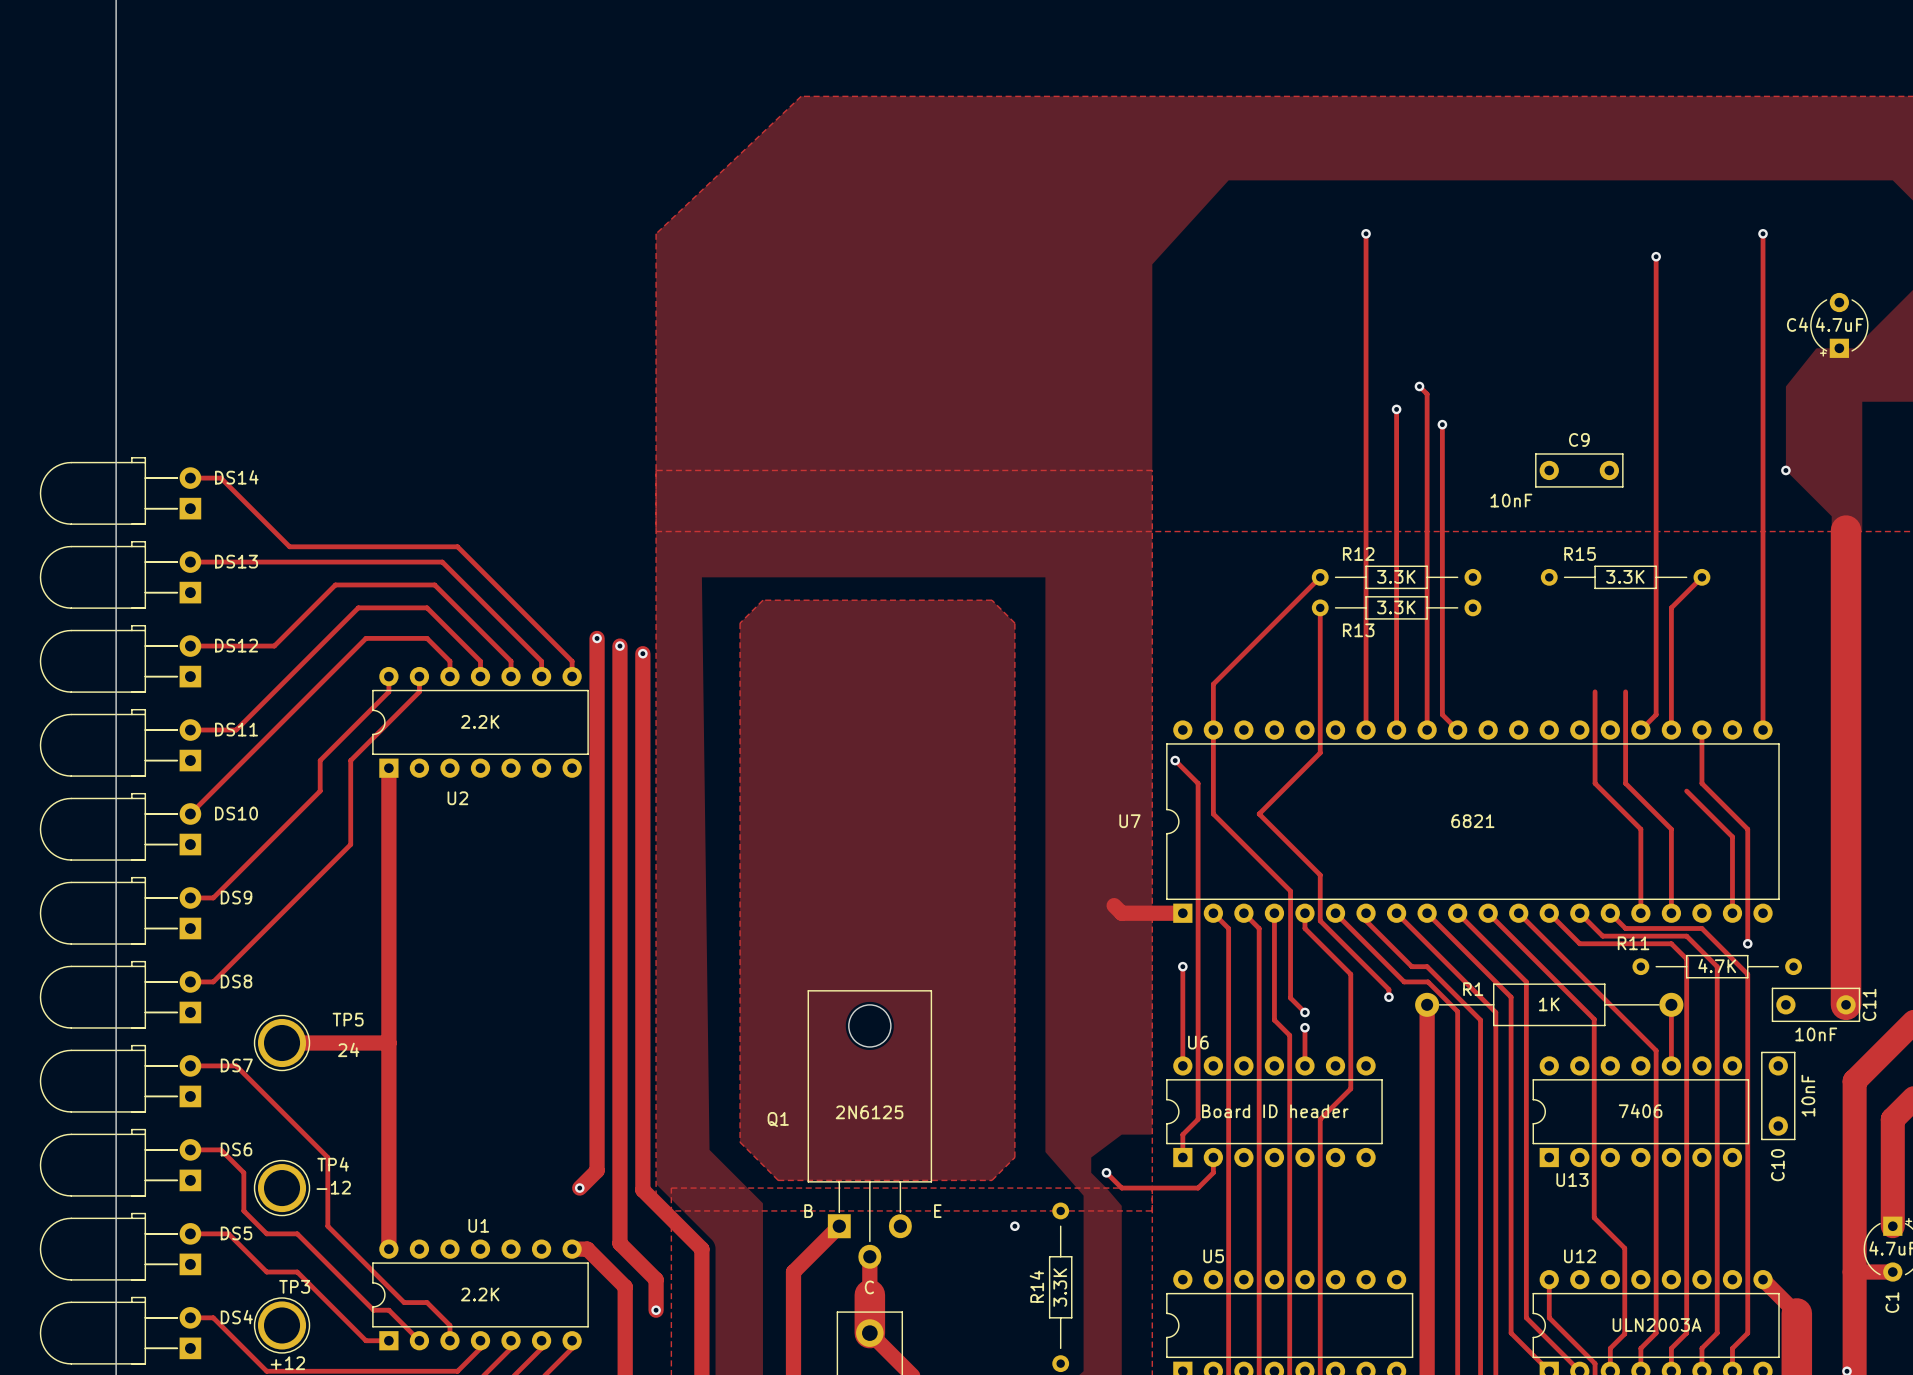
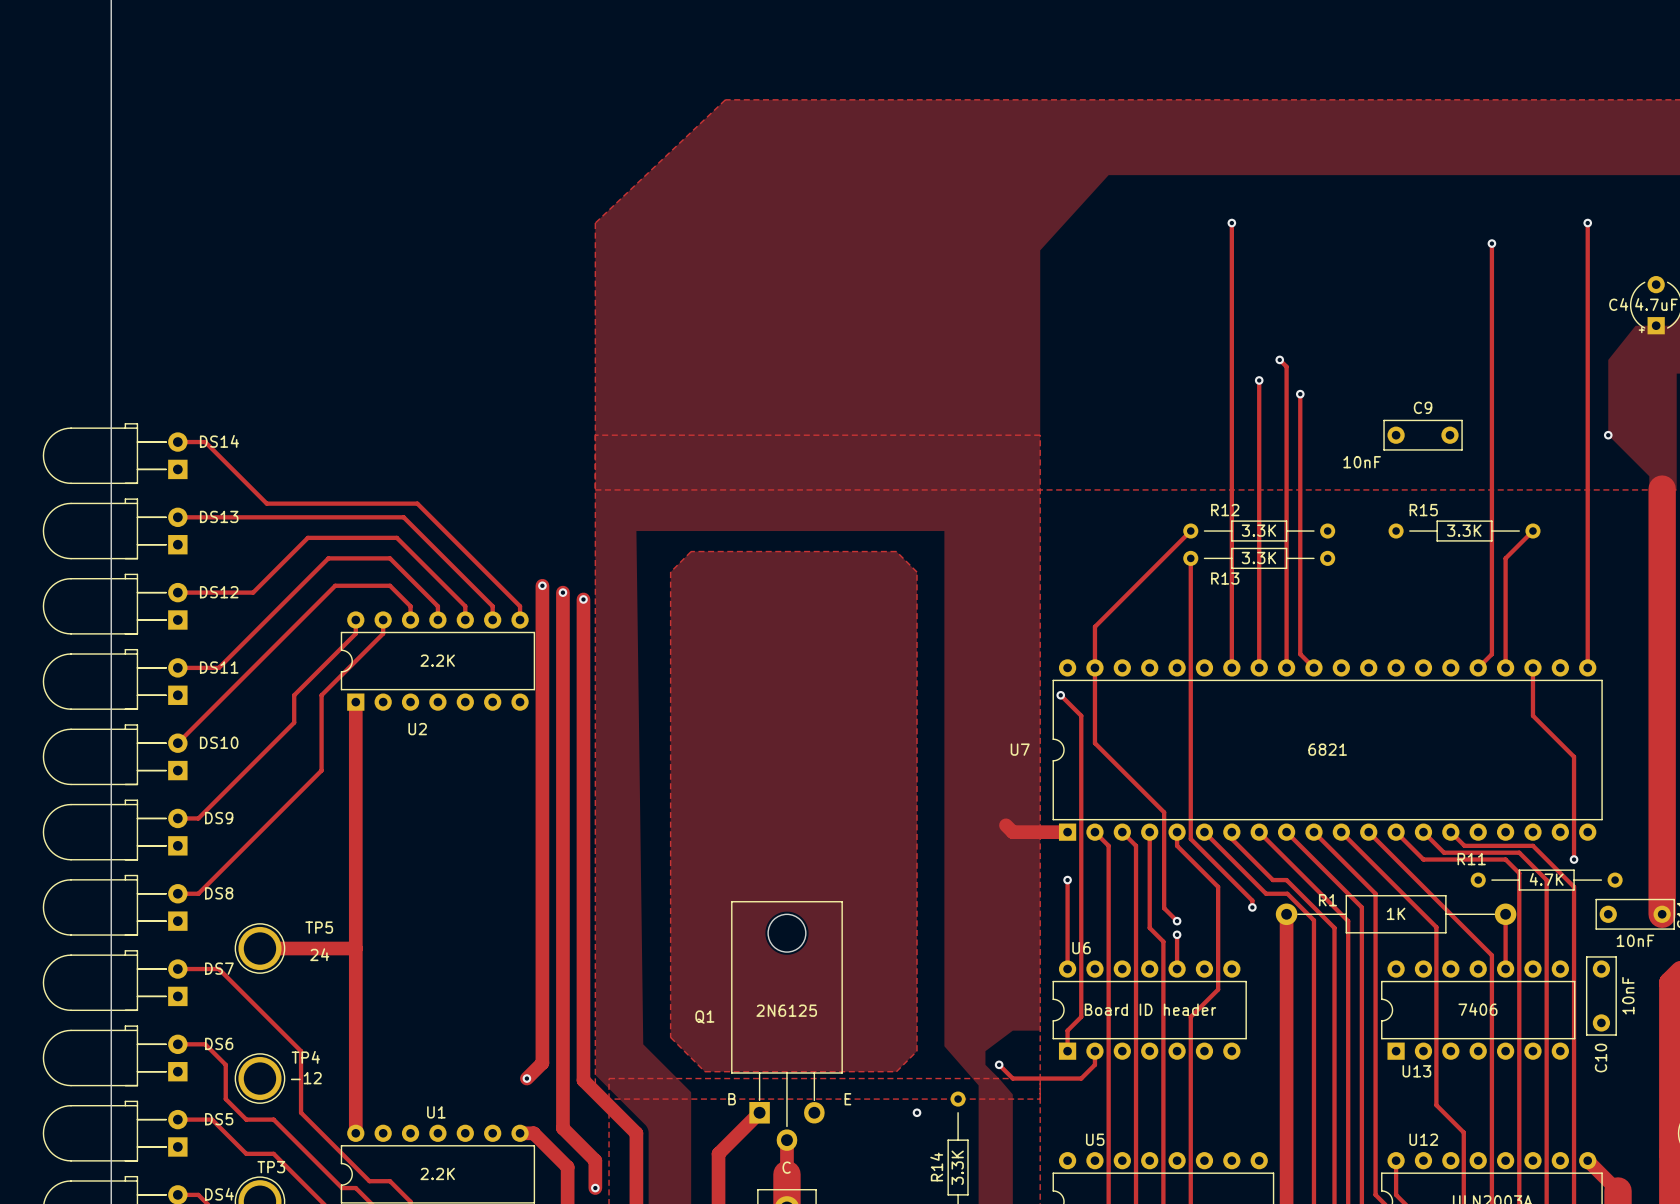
track: (1595, 691) (1595, 783) (1640, 829) (1640, 913) -> none
track: (1625, 691) (1625, 783) (1671, 829) (1671, 913) -> none
track: (1320, 752) (1259, 813) (1320, 875) -> (1190, 688) (1190, 797)
track: (1686, 791) (1732, 836) (1732, 913) -> none

